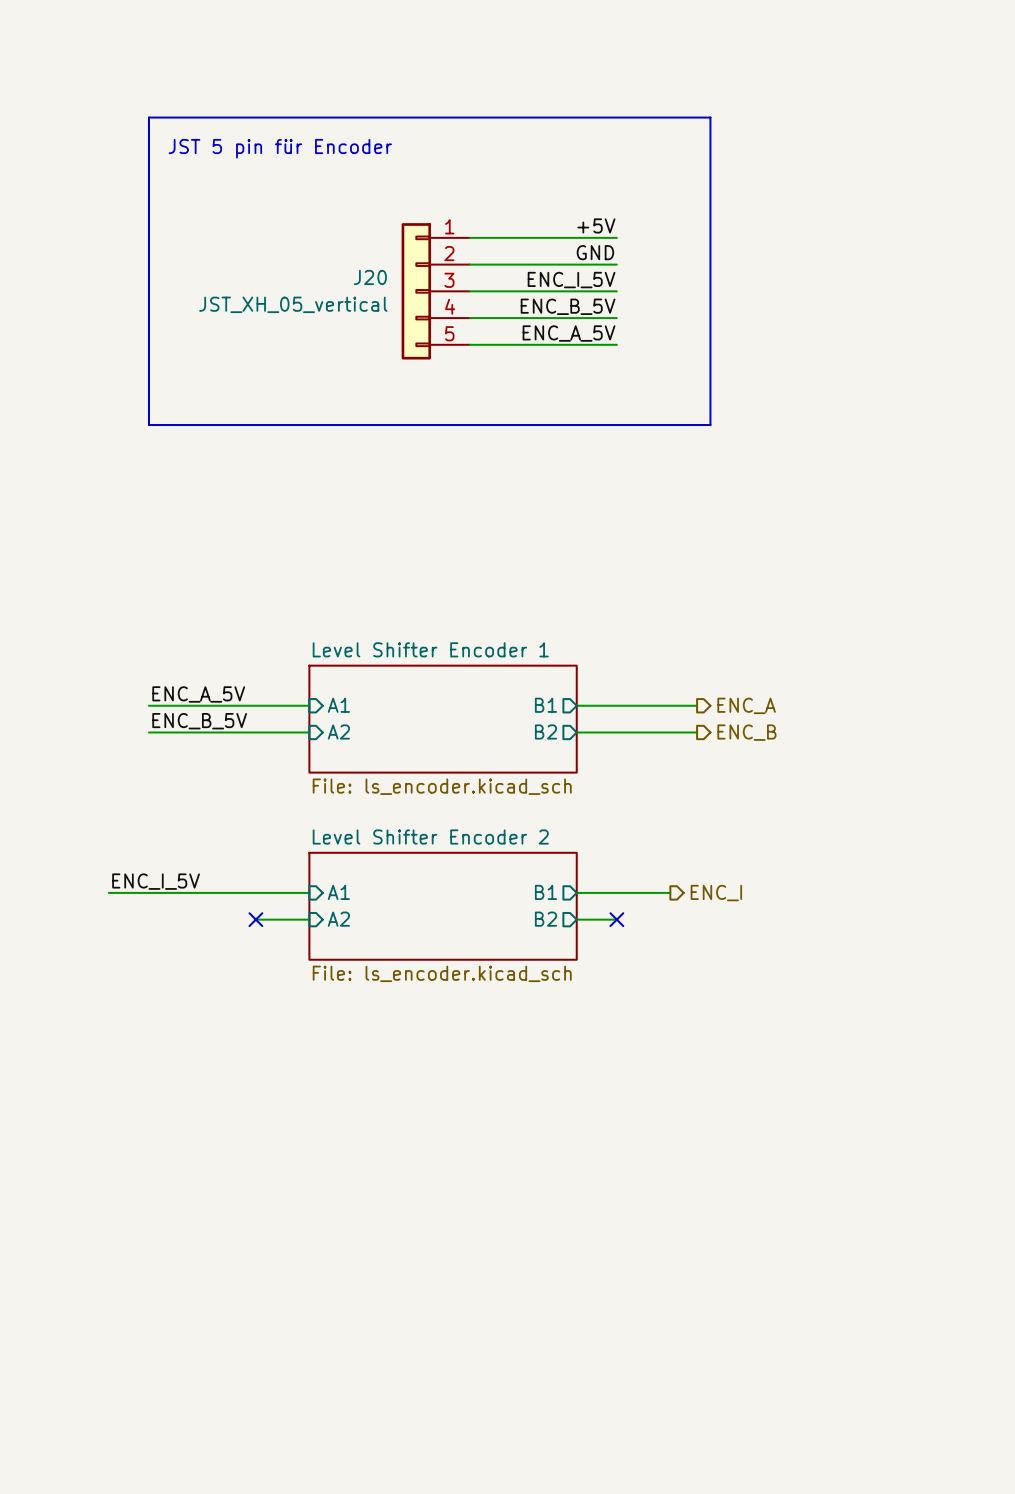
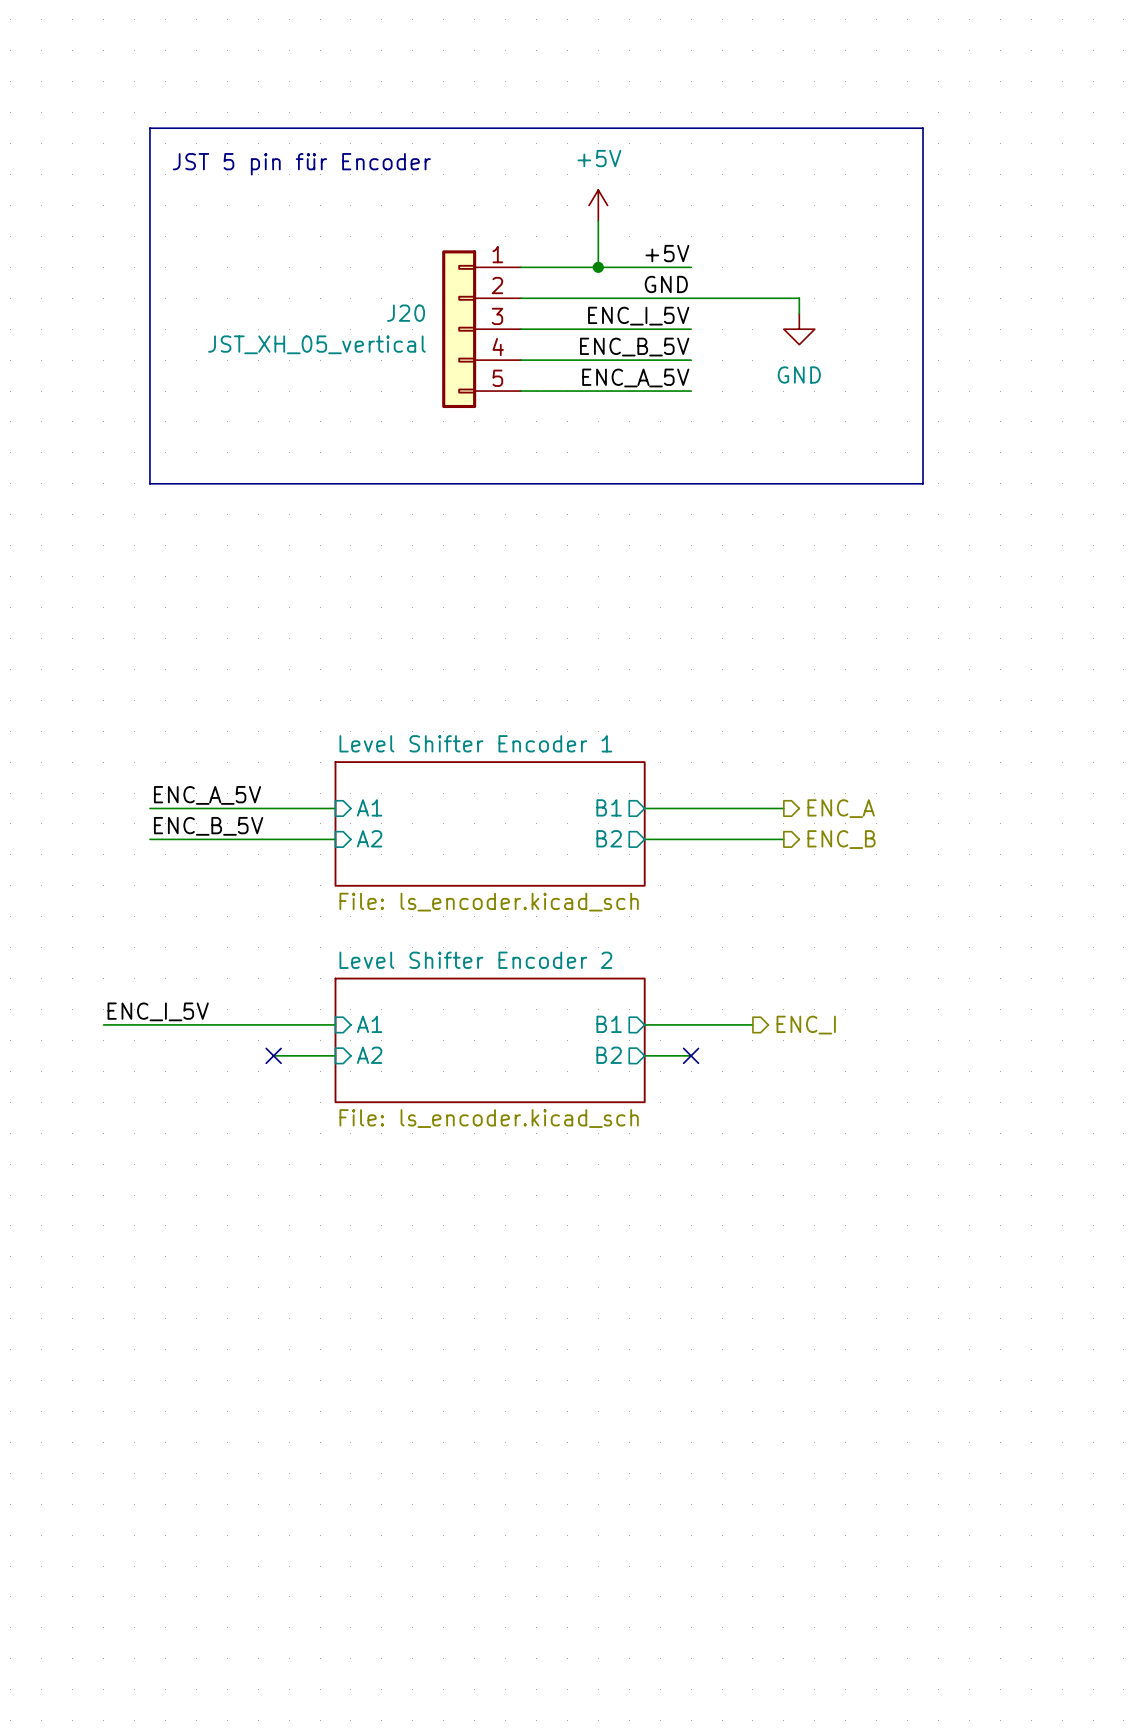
line: (710, 117) (710, 425) -> (799, 128) (923, 128) (923, 483) (799, 483)
power symbol: none -> +5V (598, 205)
wire: none -> (598, 220) (598, 267)
junction: none -> (598, 267)
wire: none -> (691, 298) (799, 298) (799, 313)
power symbol: none -> GND (799, 329)

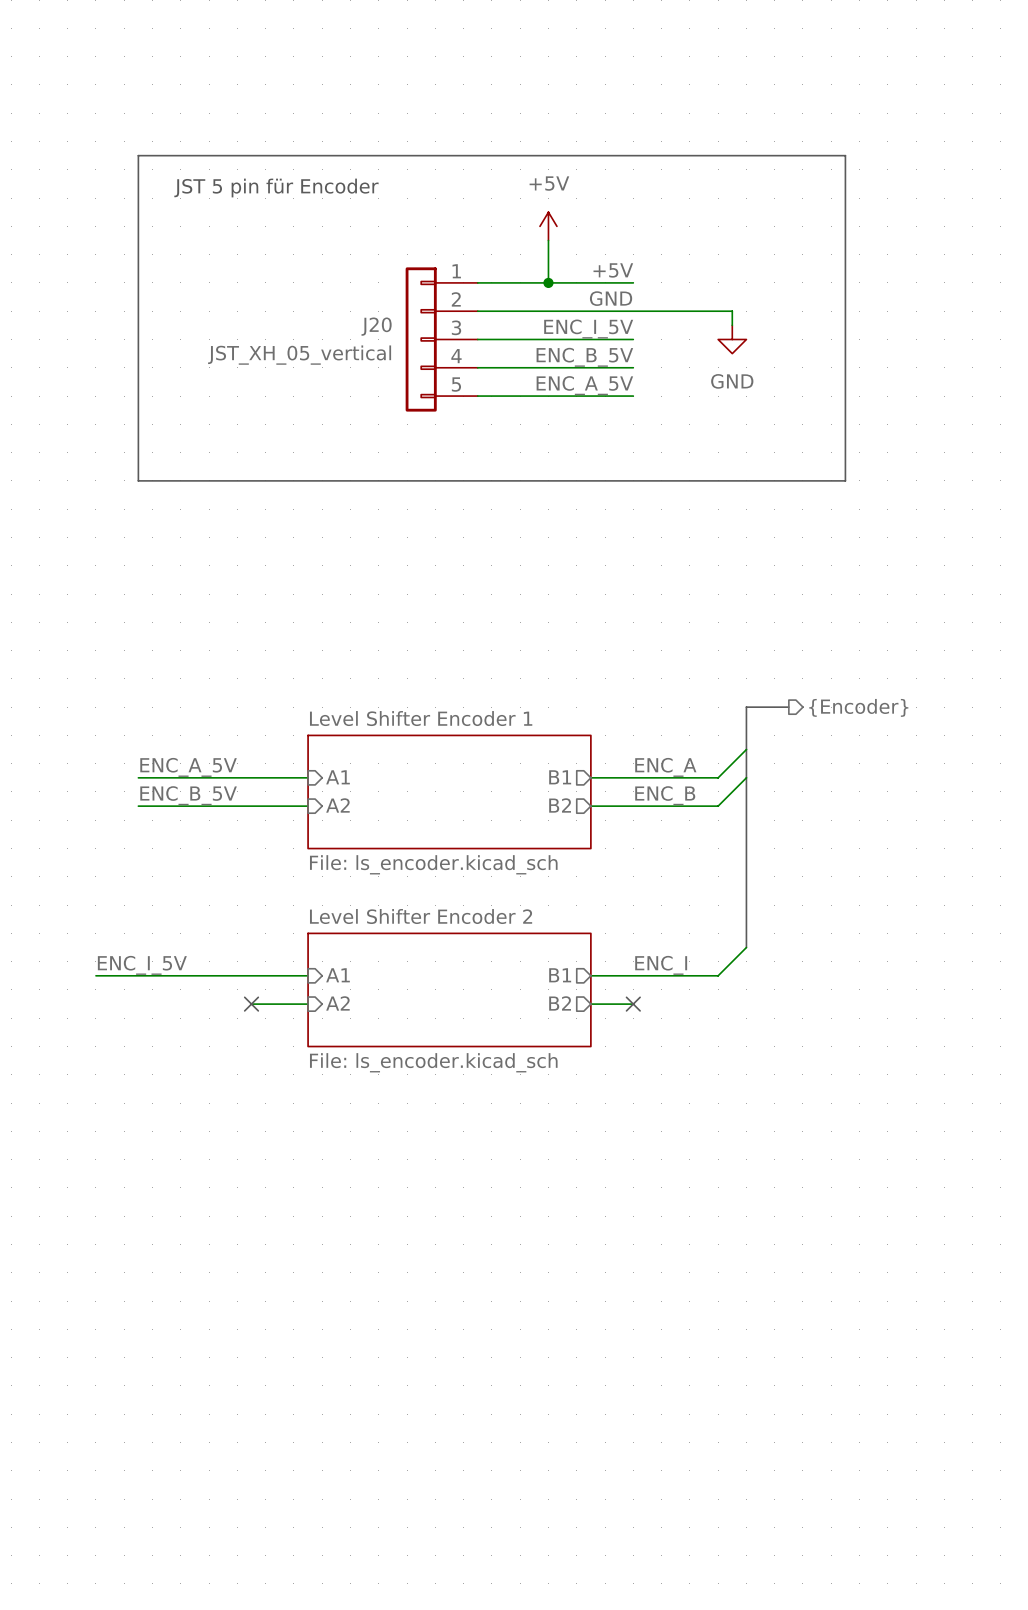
bus: none -> (788, 707) (746, 707) (746, 947)
hierarchical label: none -> {Encoder} (858, 707)
wire: none -> (746, 749) (718, 777)
label: none -> ENC_A (665, 767)
wire: none -> (746, 777) (718, 806)
hierarchical label: ENC_A (841, 808) -> none
label: none -> ENC_B (665, 795)
hierarchical label: ENC_B (841, 839) -> none
wire: none -> (746, 947) (718, 975) (689, 975)
label: none -> ENC_I (661, 965)
hierarchical label: ENC_I (806, 1025) -> none

